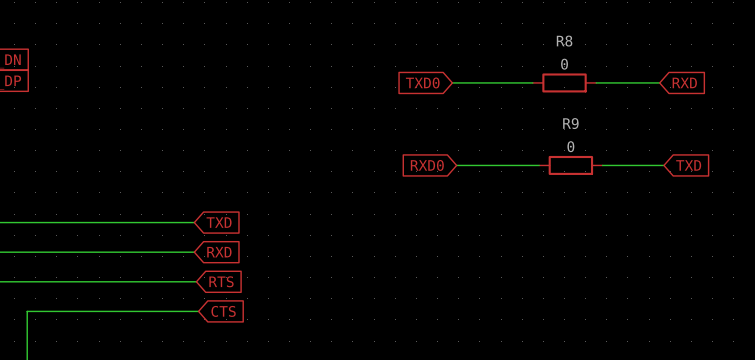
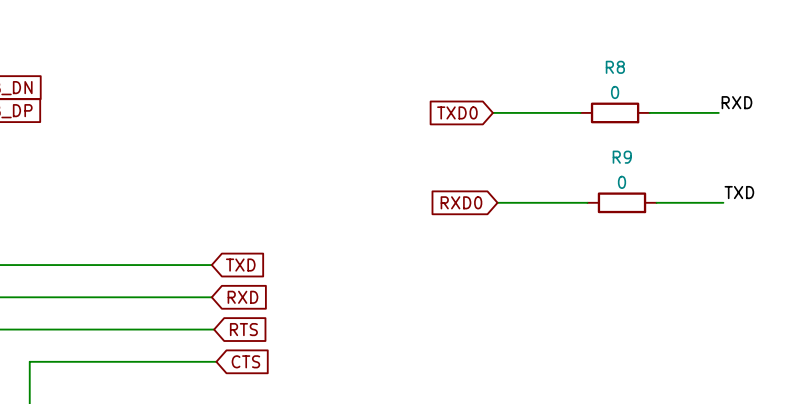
label: none -> RXD (736, 102)
global label: RXD (684, 82) -> none
label: none -> TXD (739, 192)
global label: TXD (688, 165) -> none

